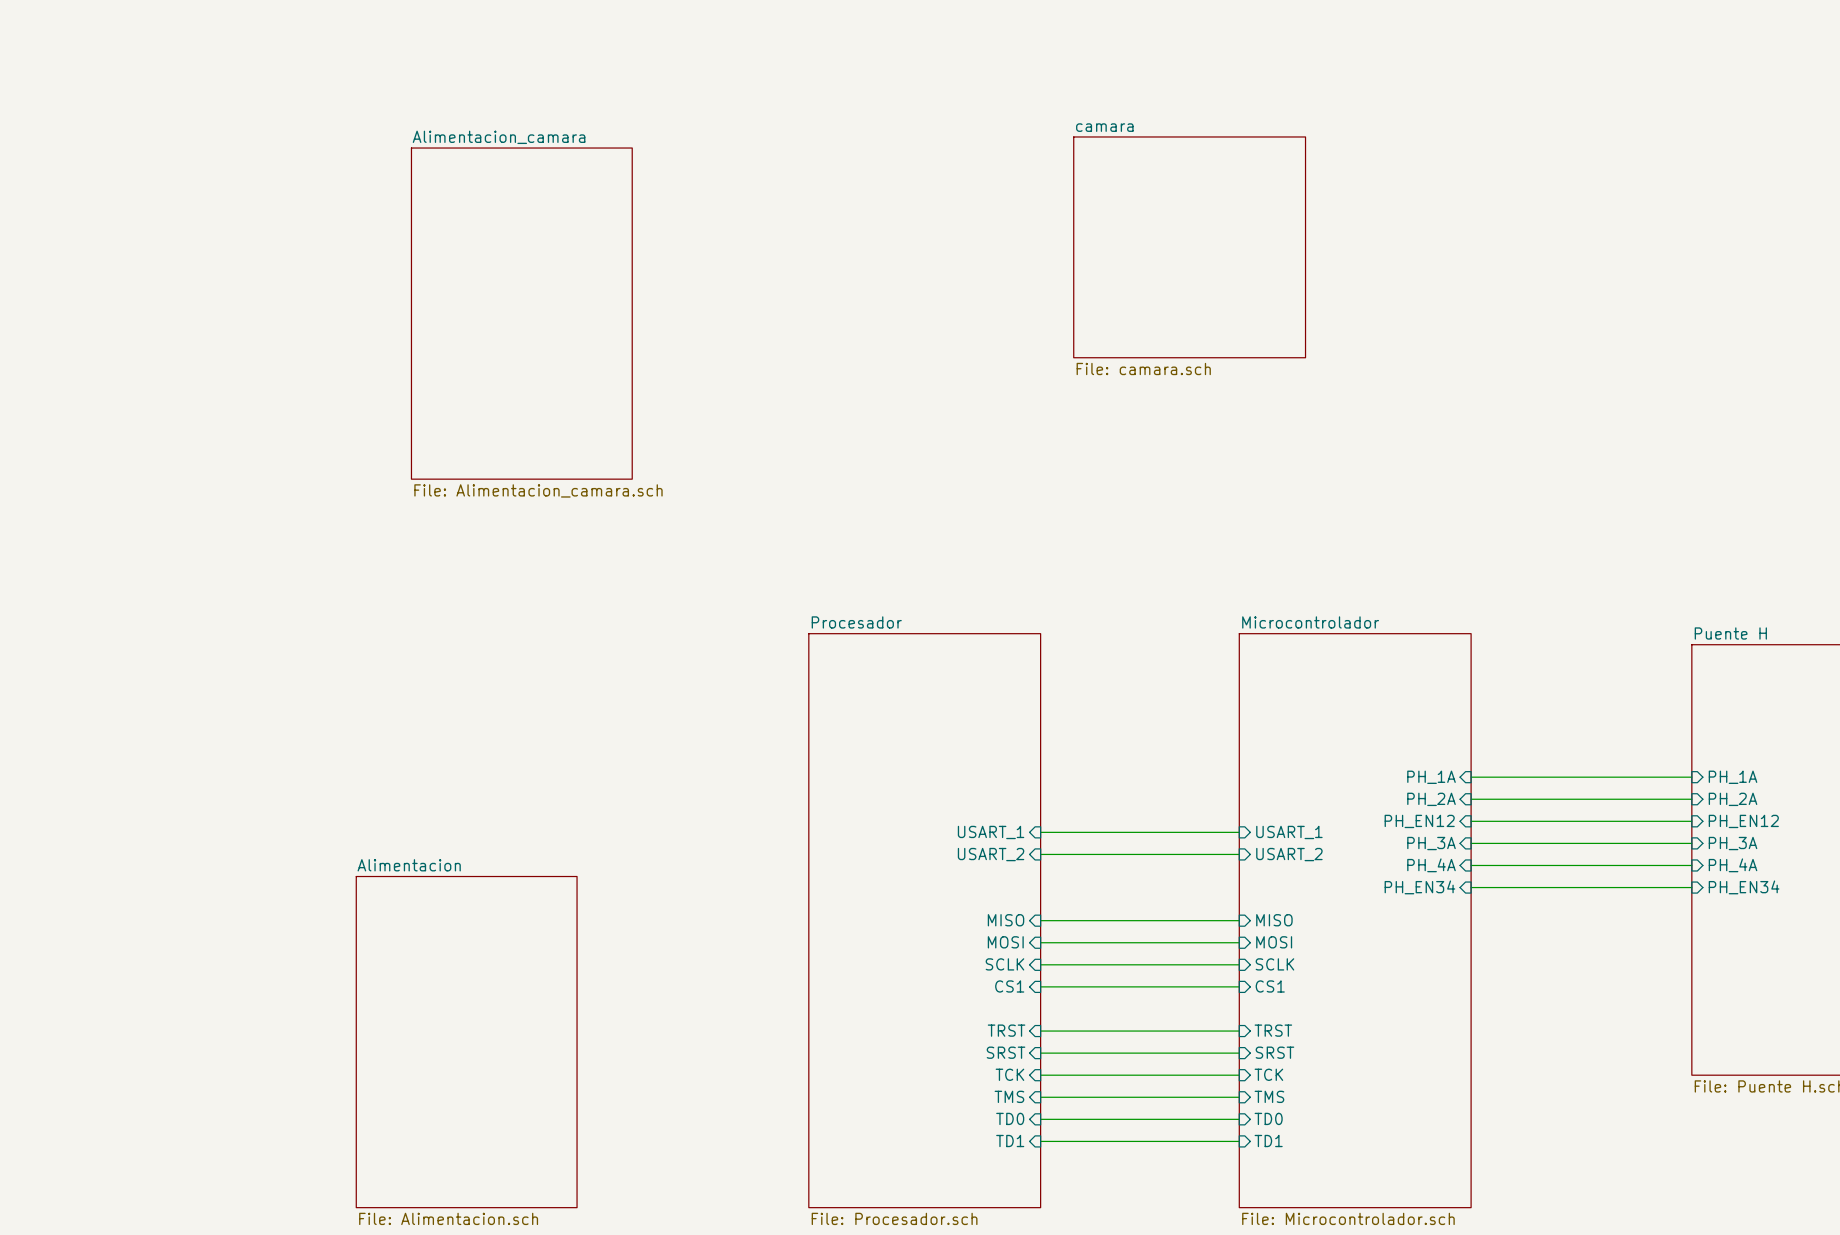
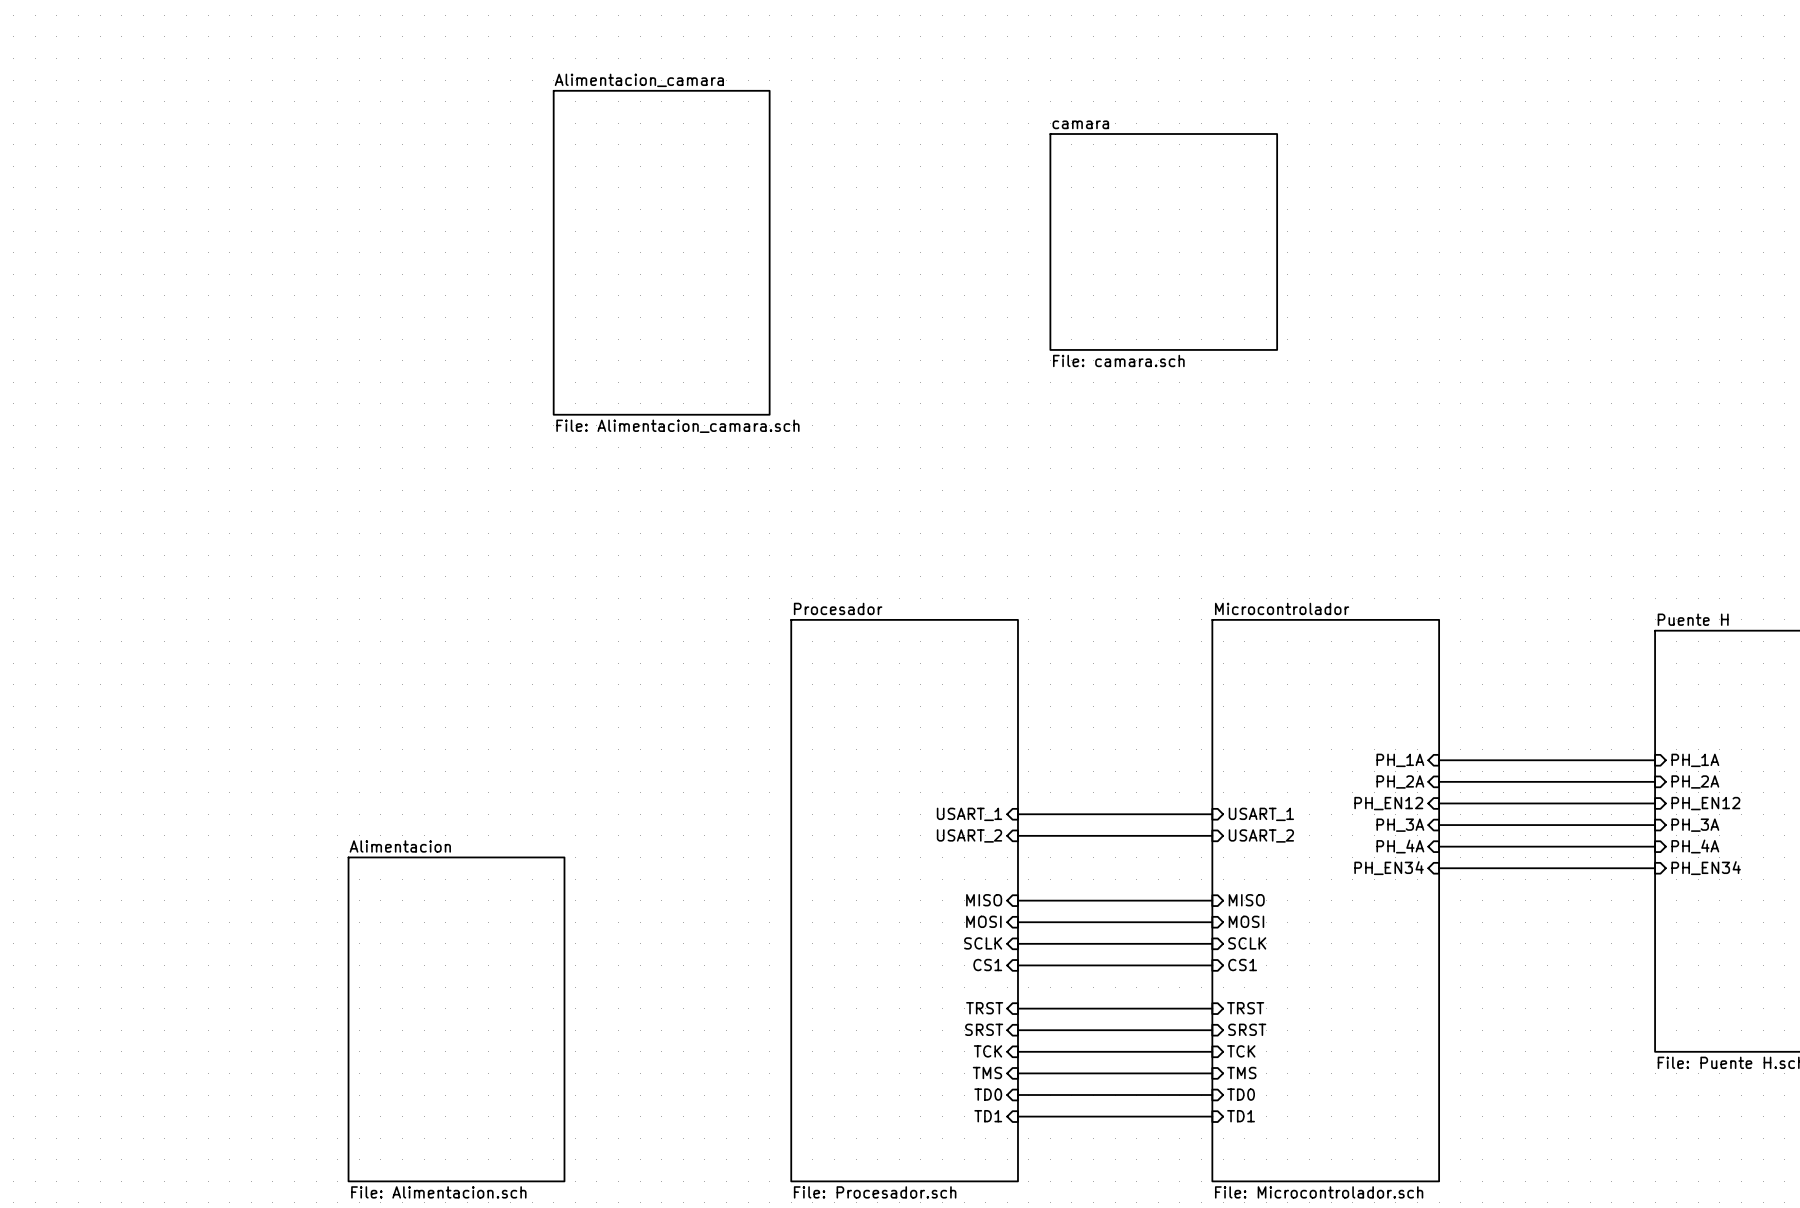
sheet Alimentacion_camara position: (521, 313) -> (661, 252)

